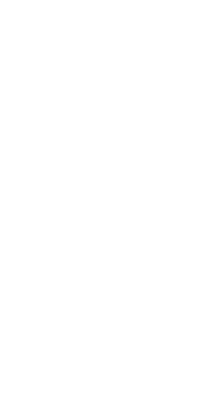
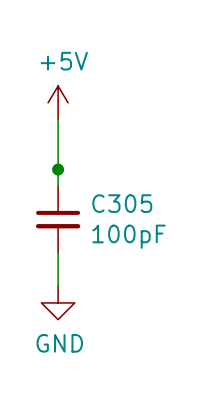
power symbol: none -> +5V (58, 102)
wire: none -> (58, 119) (58, 186)
junction: none -> (58, 169)
C305: none -> 100pF (58, 219)
wire: none -> (58, 252) (58, 286)
power symbol: none -> GND (58, 302)

